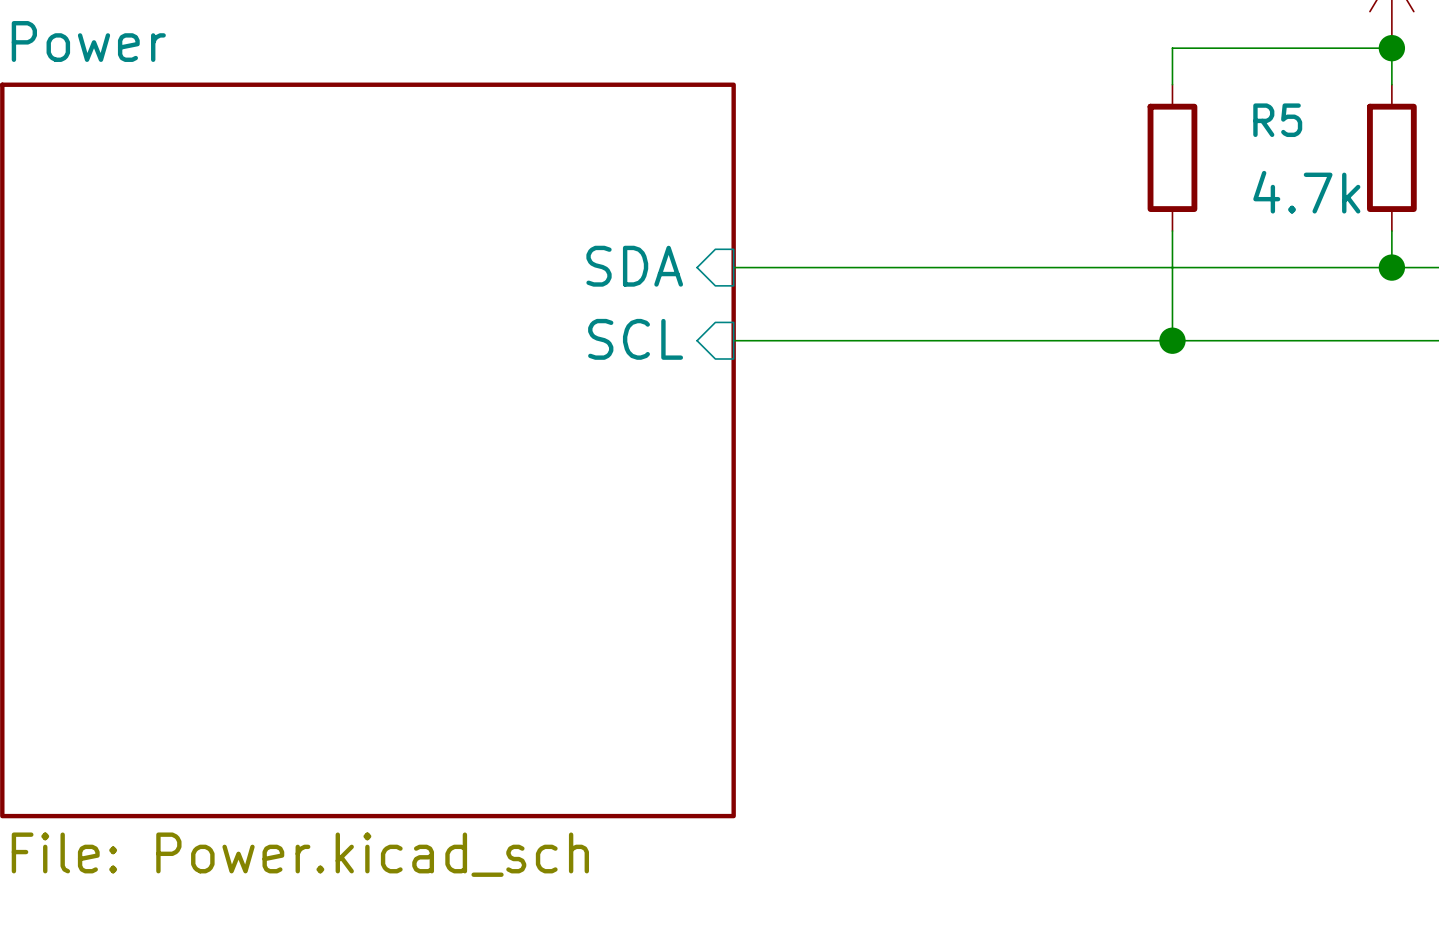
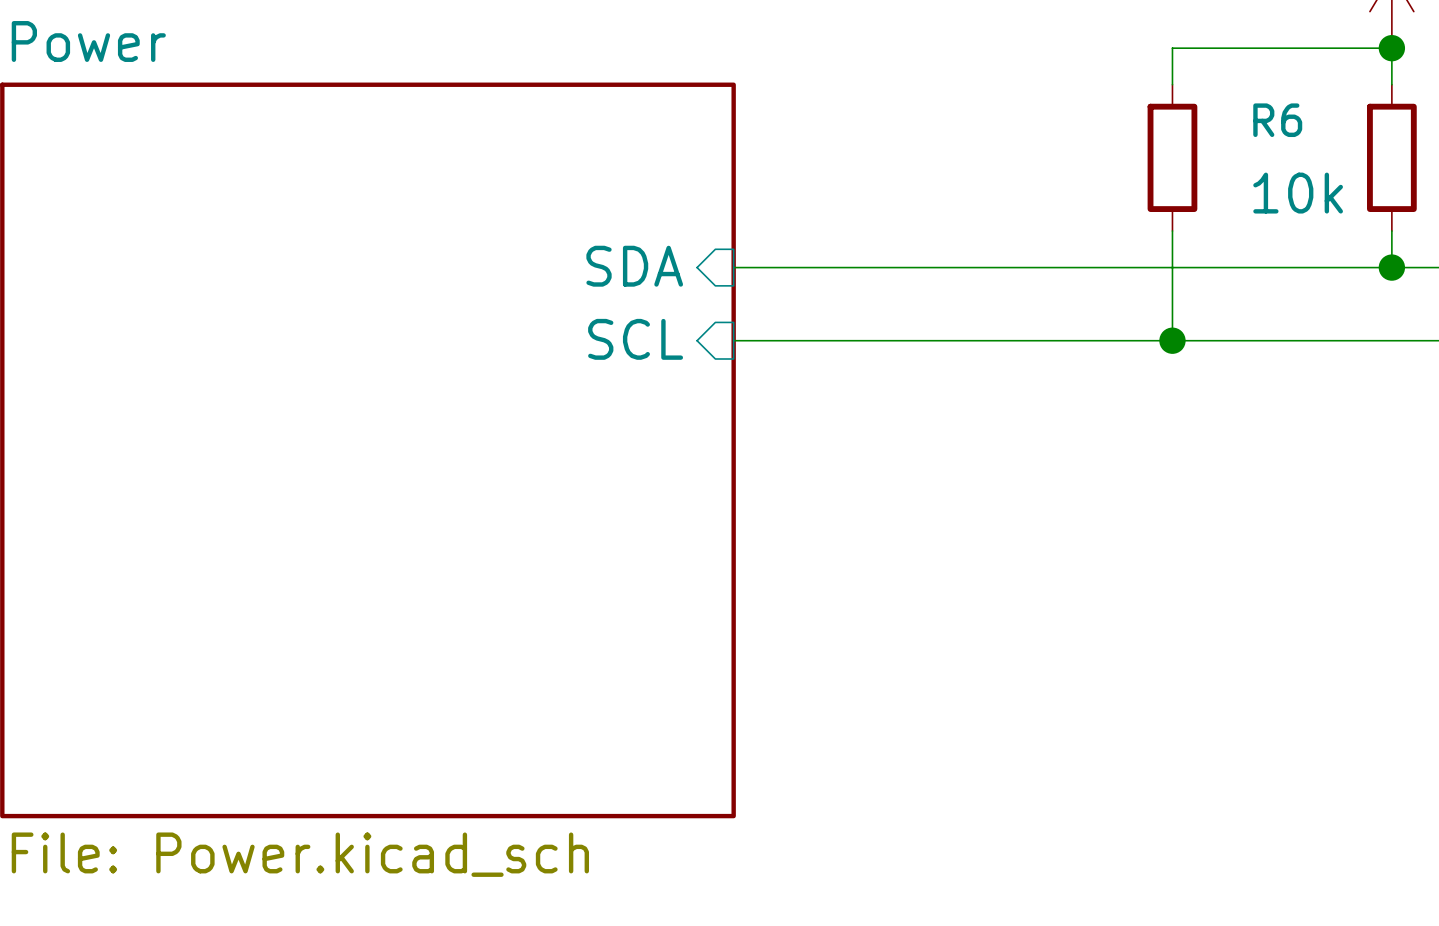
R5 name: R5 (1277, 120) -> R6 (1277, 120)
R5 value: 4.7k (1306, 192) -> 10k (1298, 193)

